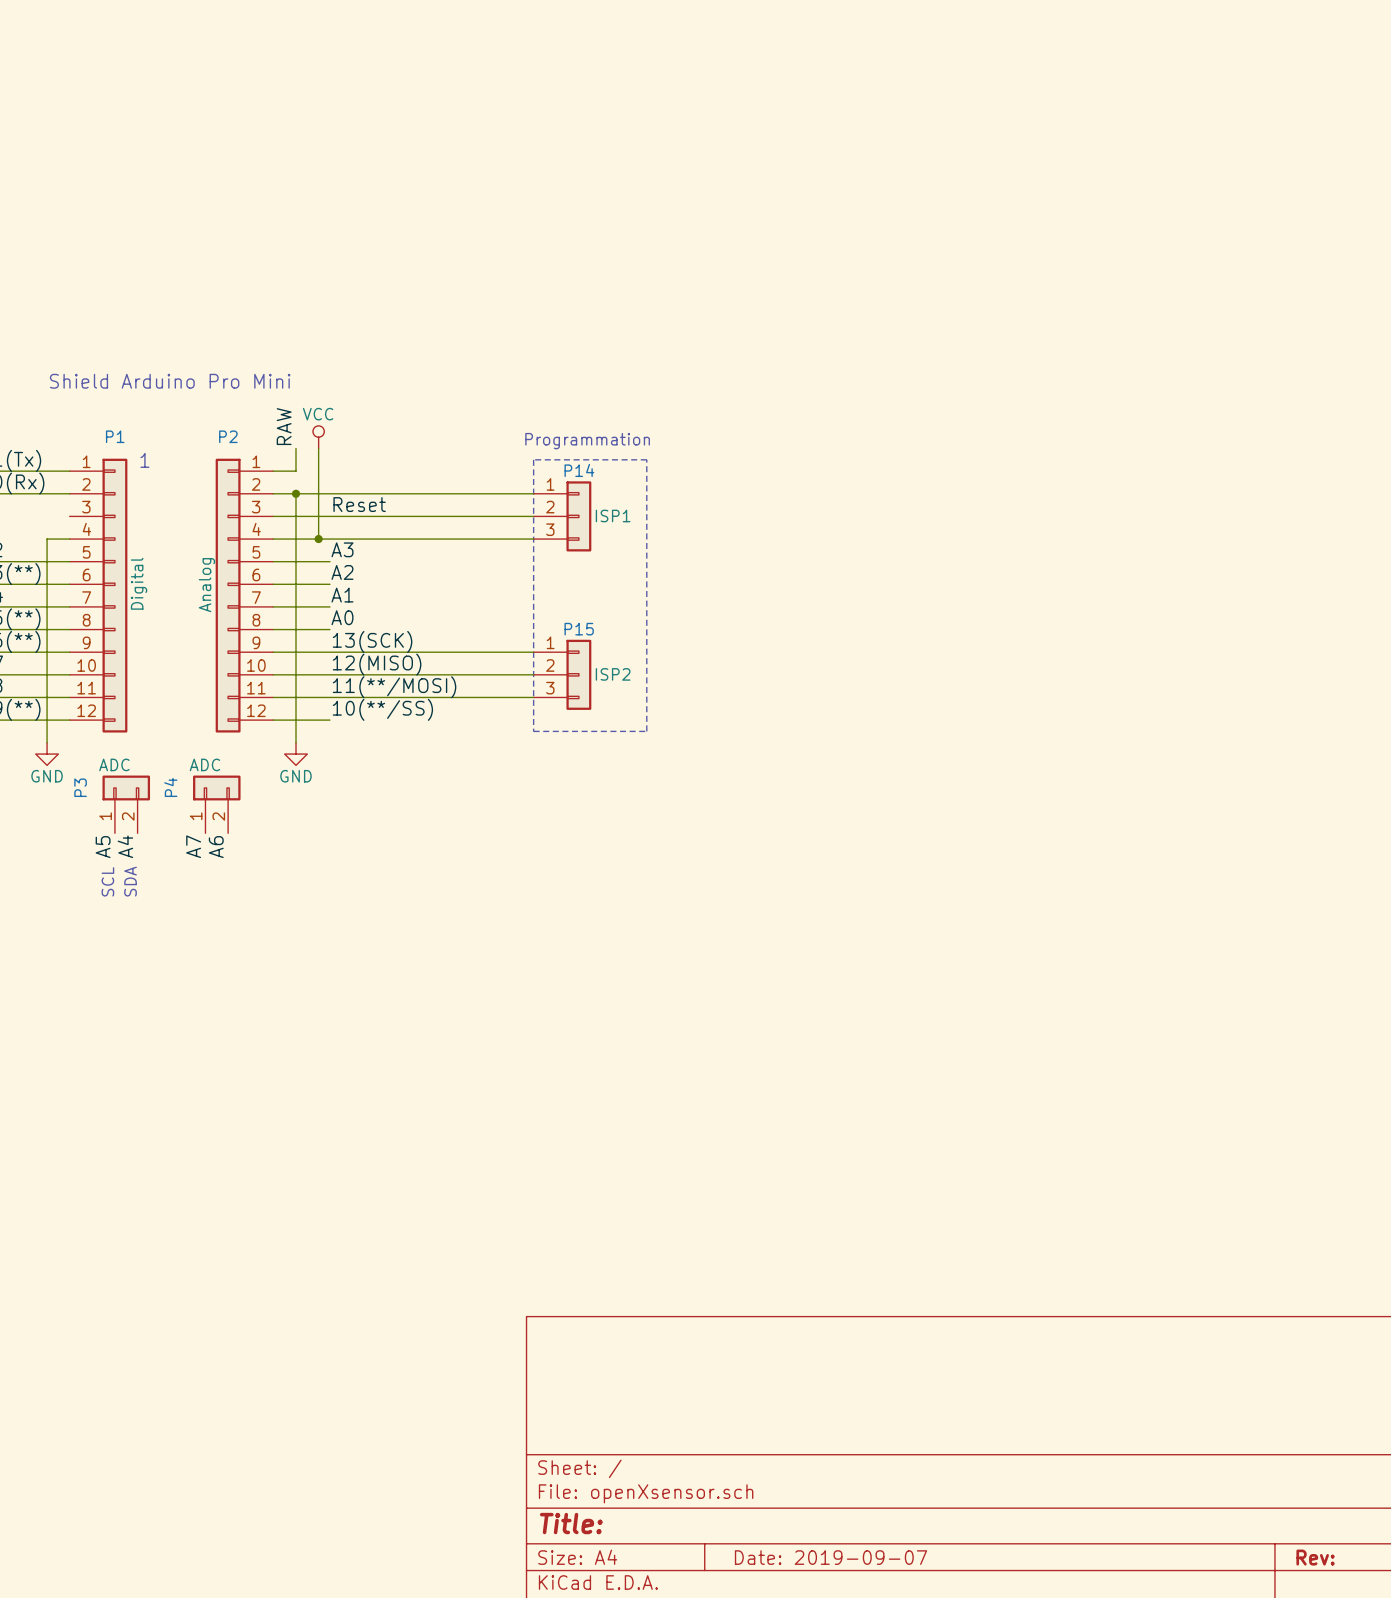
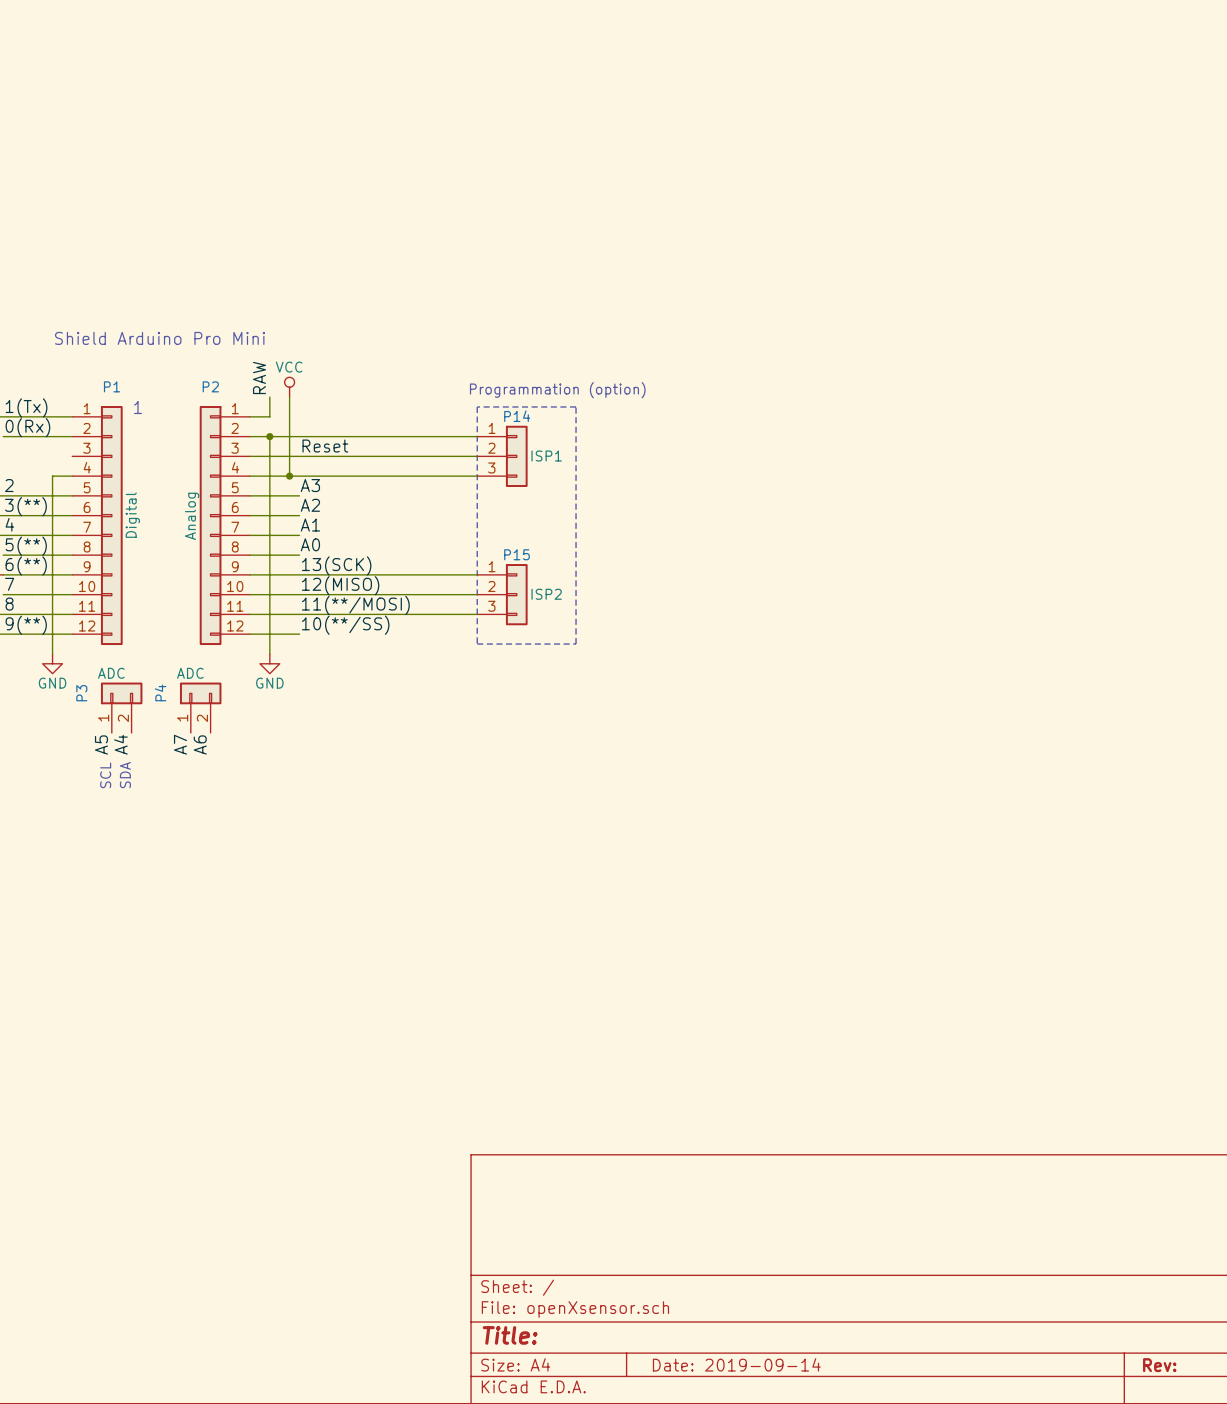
text: Programmation (587, 441) -> Programmation (option) (557, 390)
title block: Date: 2019-09-07 (830, 1557) -> Date: 2019-09-14 (736, 1364)

